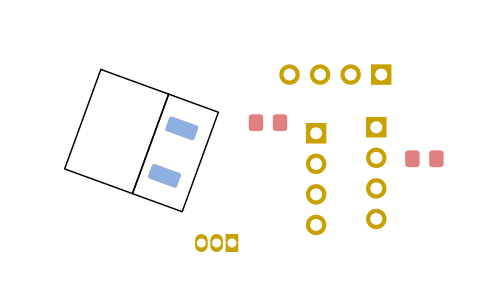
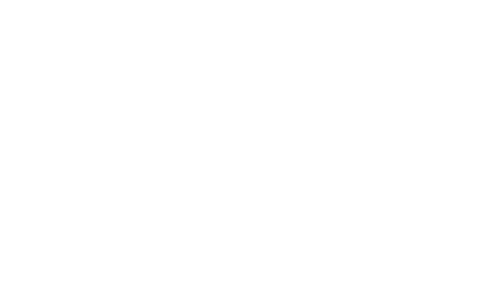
part: (335, 74) -> none
part: (267, 122) -> none
part: (141, 140) -> none
part: (424, 158) -> none
part: (376, 173) -> none
part: (316, 179) -> none
part: (216, 242) -> none

